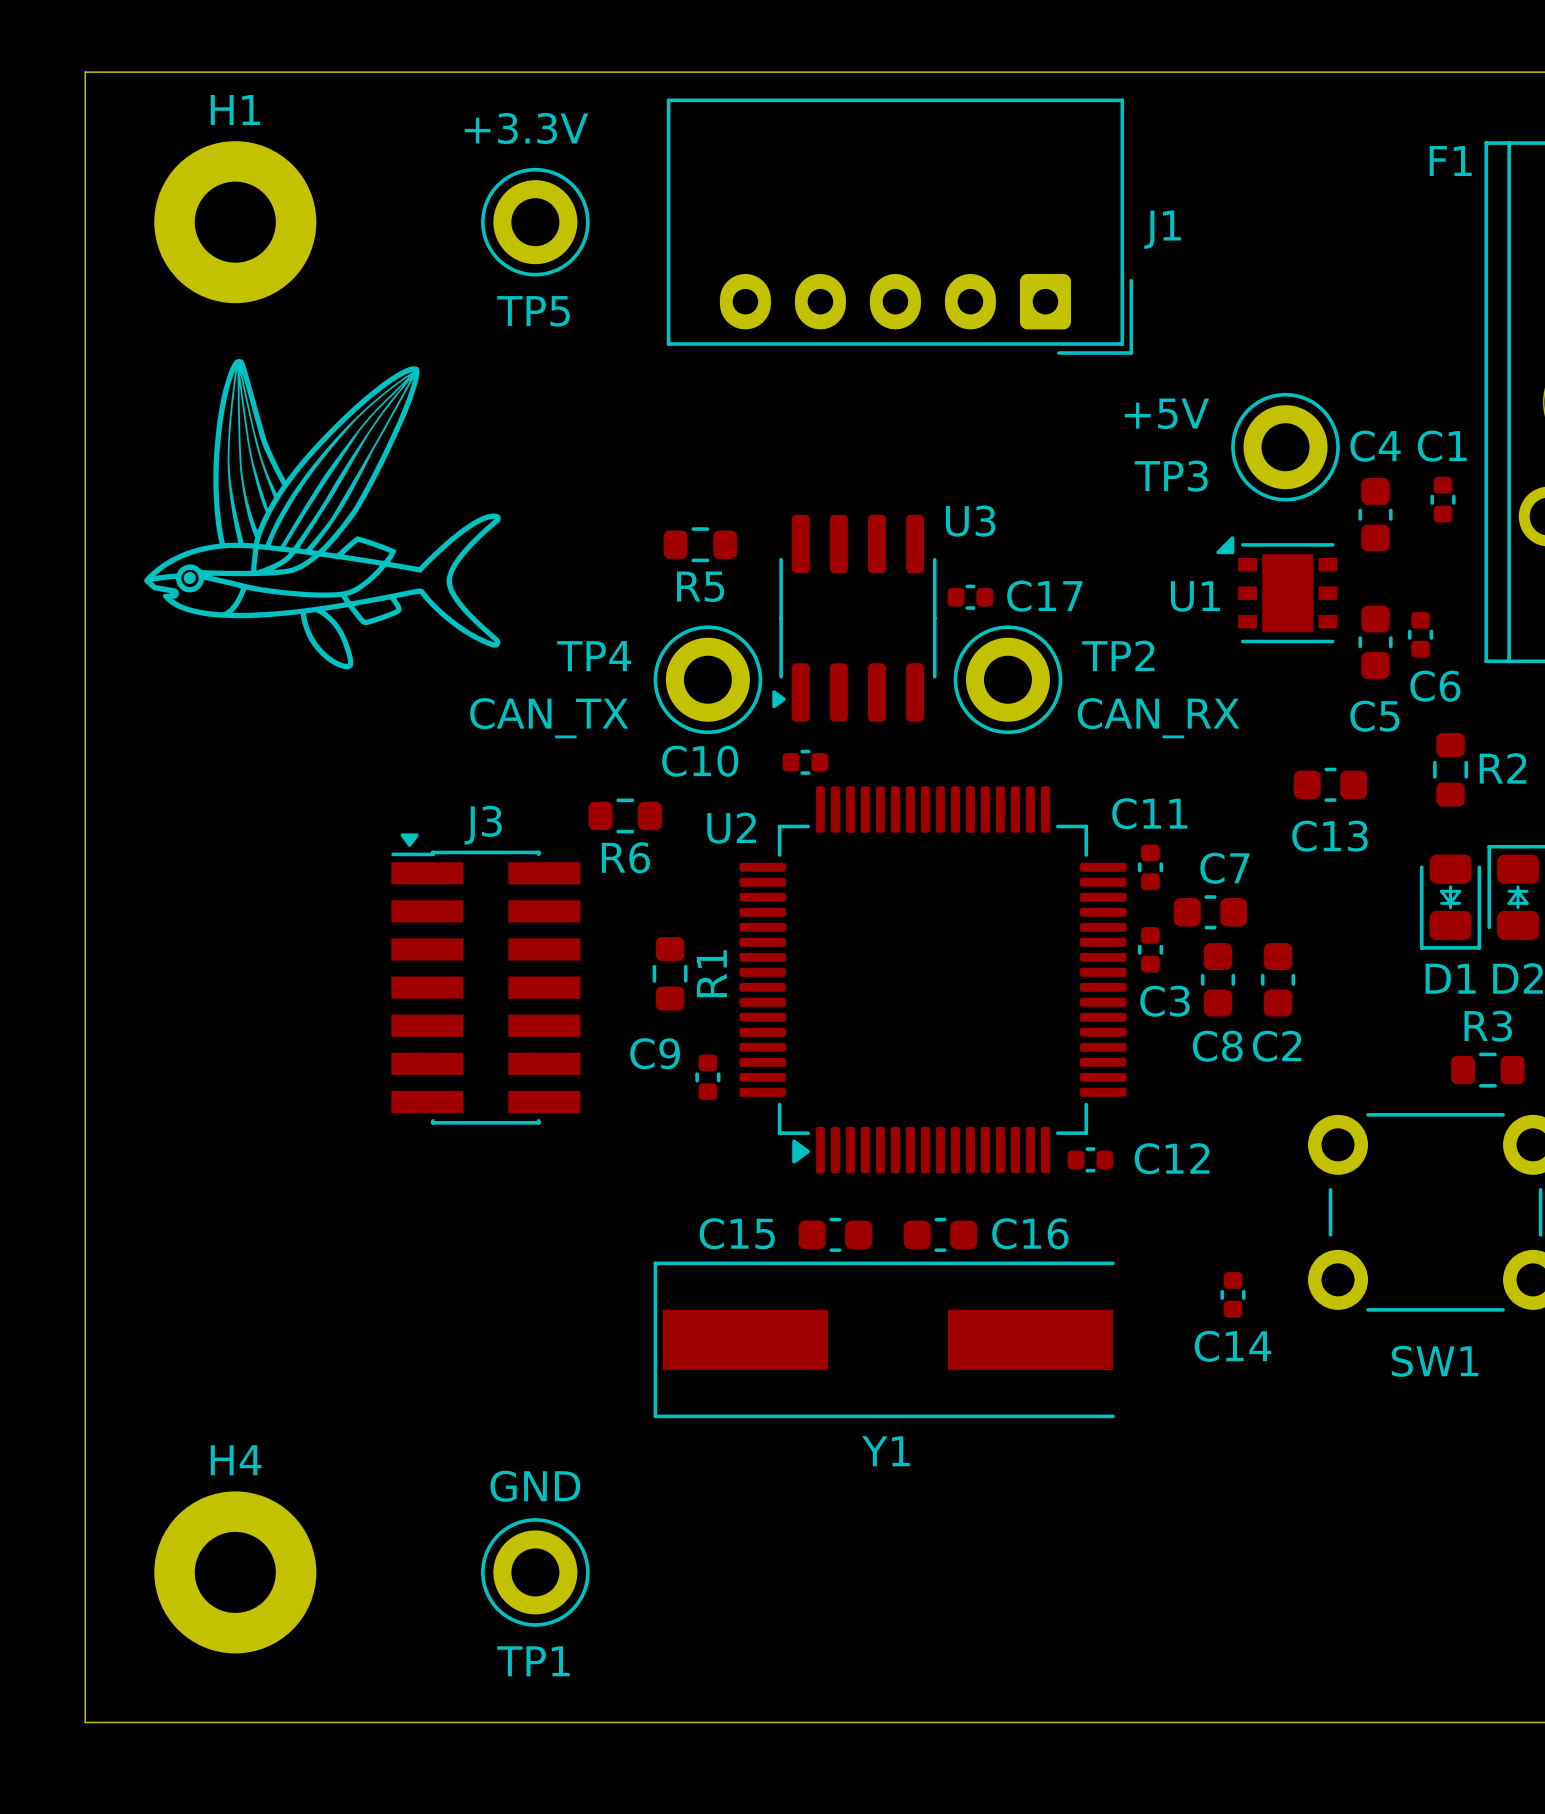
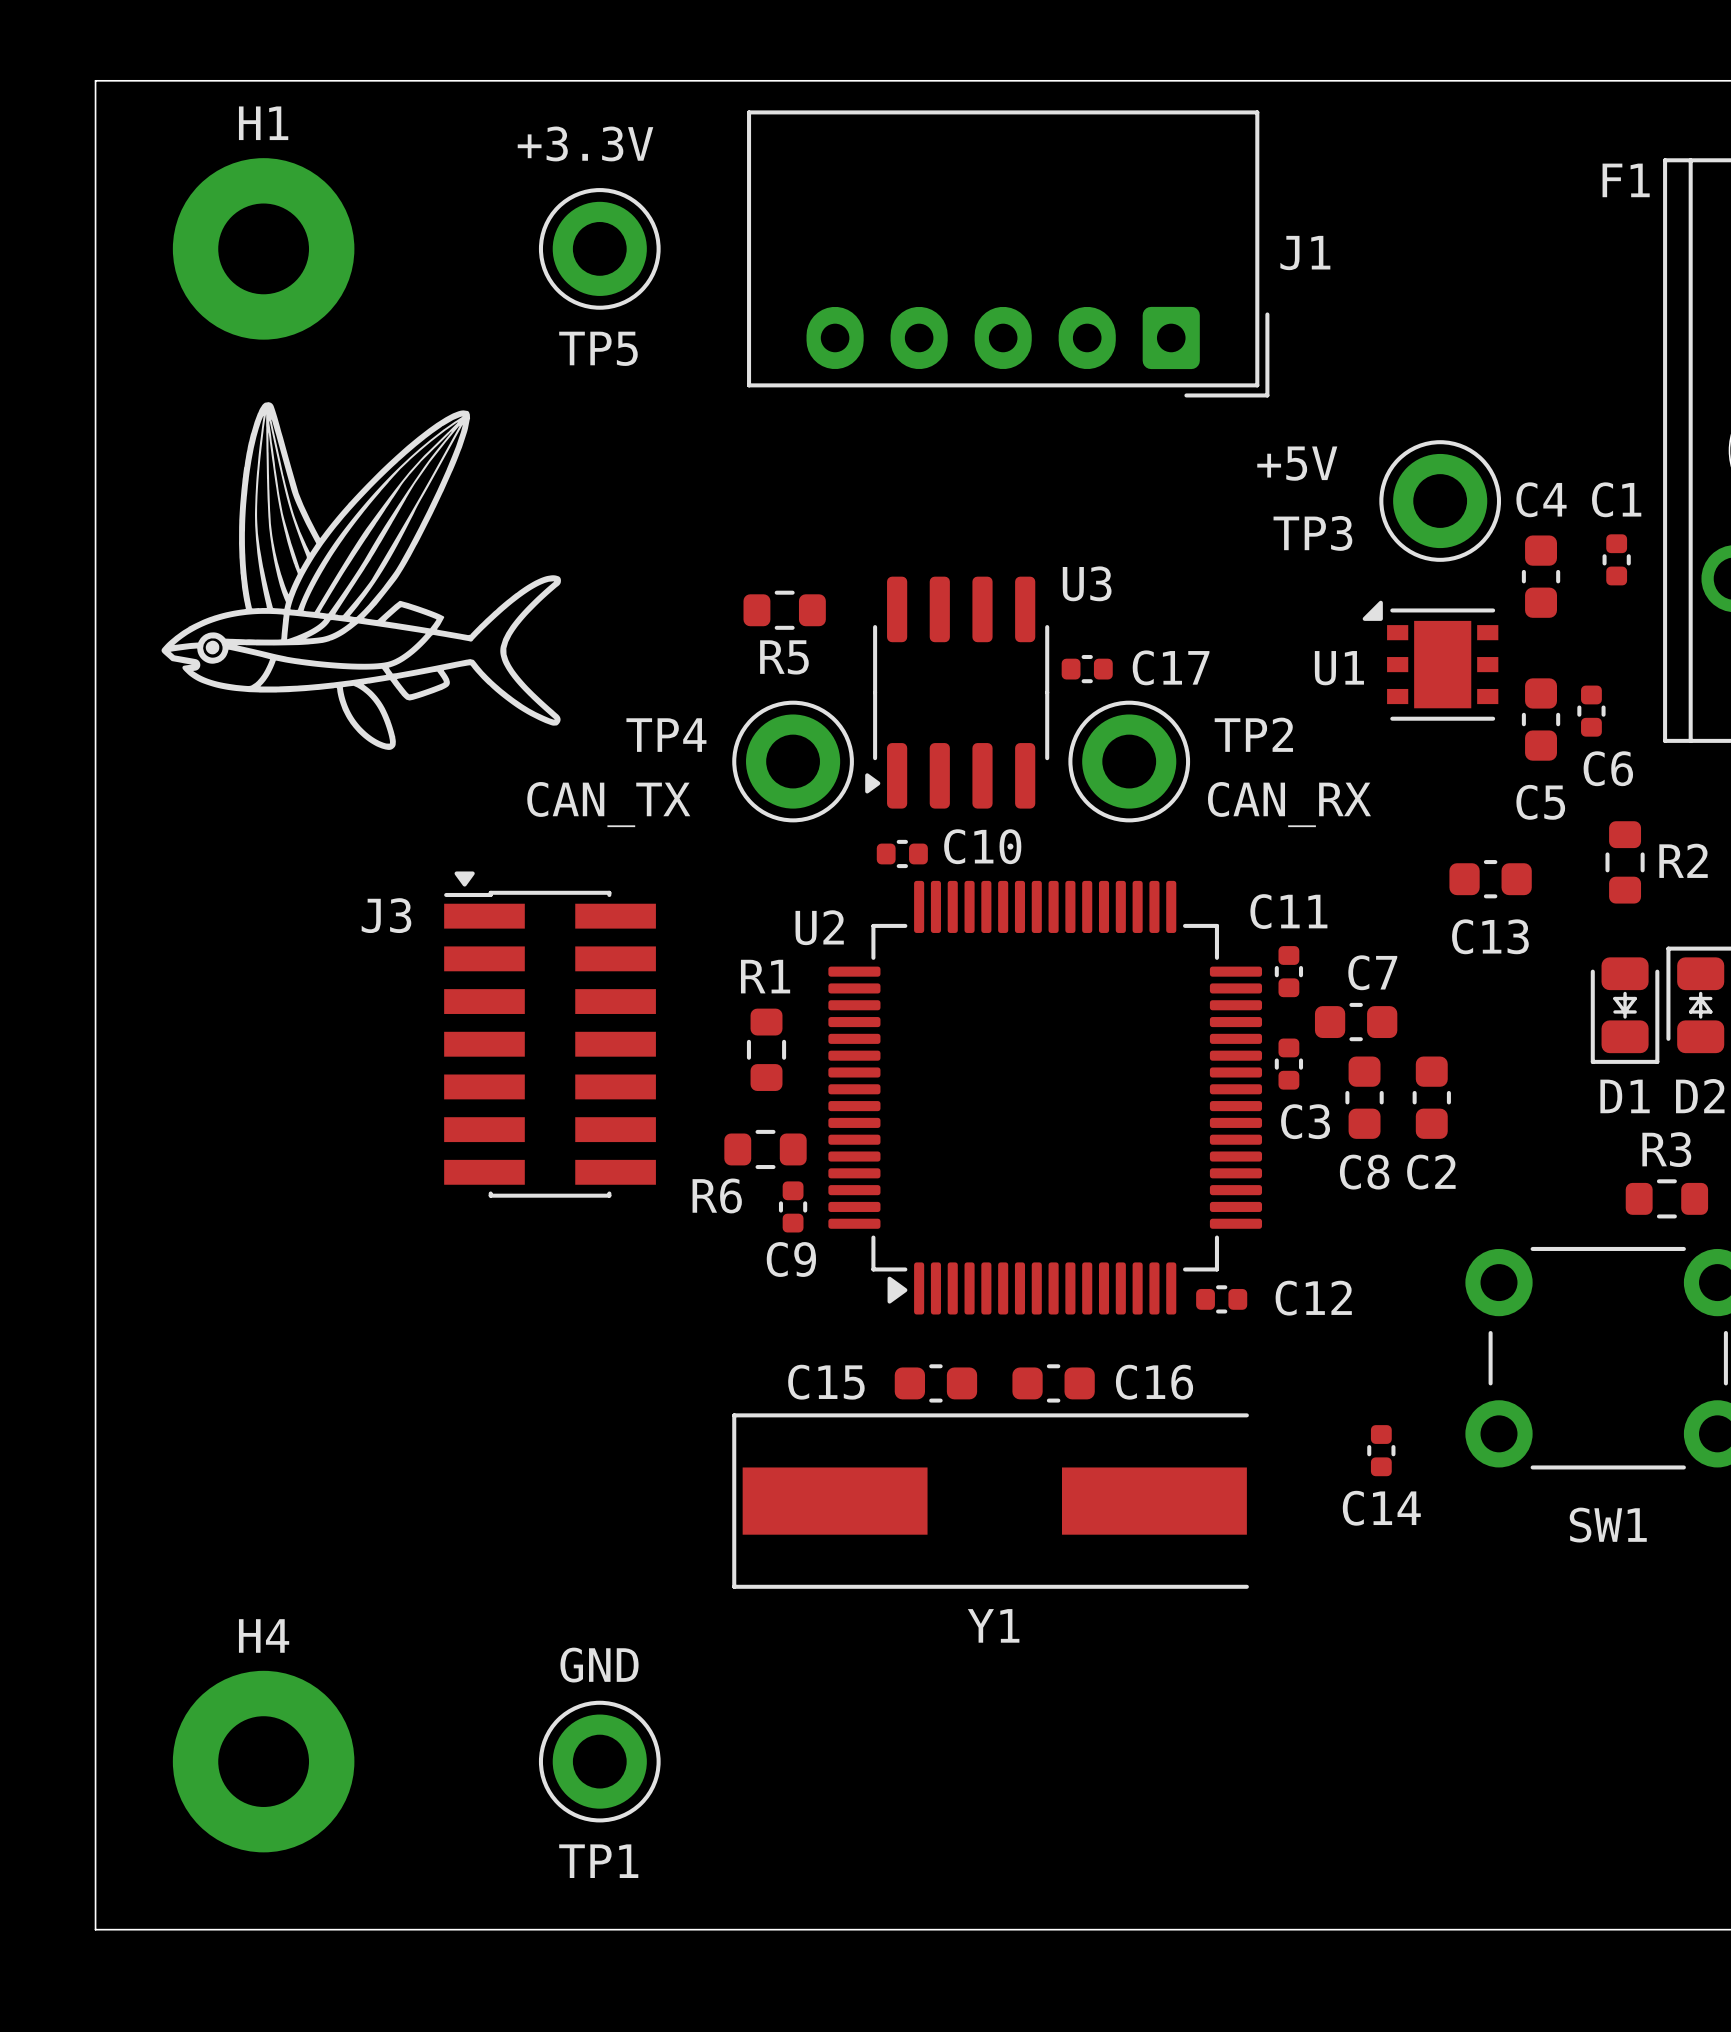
C10 name position: C10 (700, 761) -> C10 (982, 846)
R6 position: (625, 815) -> (765, 1149)
J3 name position: J3 (483, 825) -> J3 (386, 915)
R6 name position: R6 (625, 857) -> R6 (717, 1195)
R1 position: (670, 973) -> (766, 1049)
R1 name rotation: 0° (711, 973) -> 90° clockwise (765, 976)
R1 name position: R1 (711, 973) -> R1 (765, 976)
J3 position: (485, 978) -> (550, 1034)
C9 name position: C9 (655, 1053) -> C9 (791, 1259)

